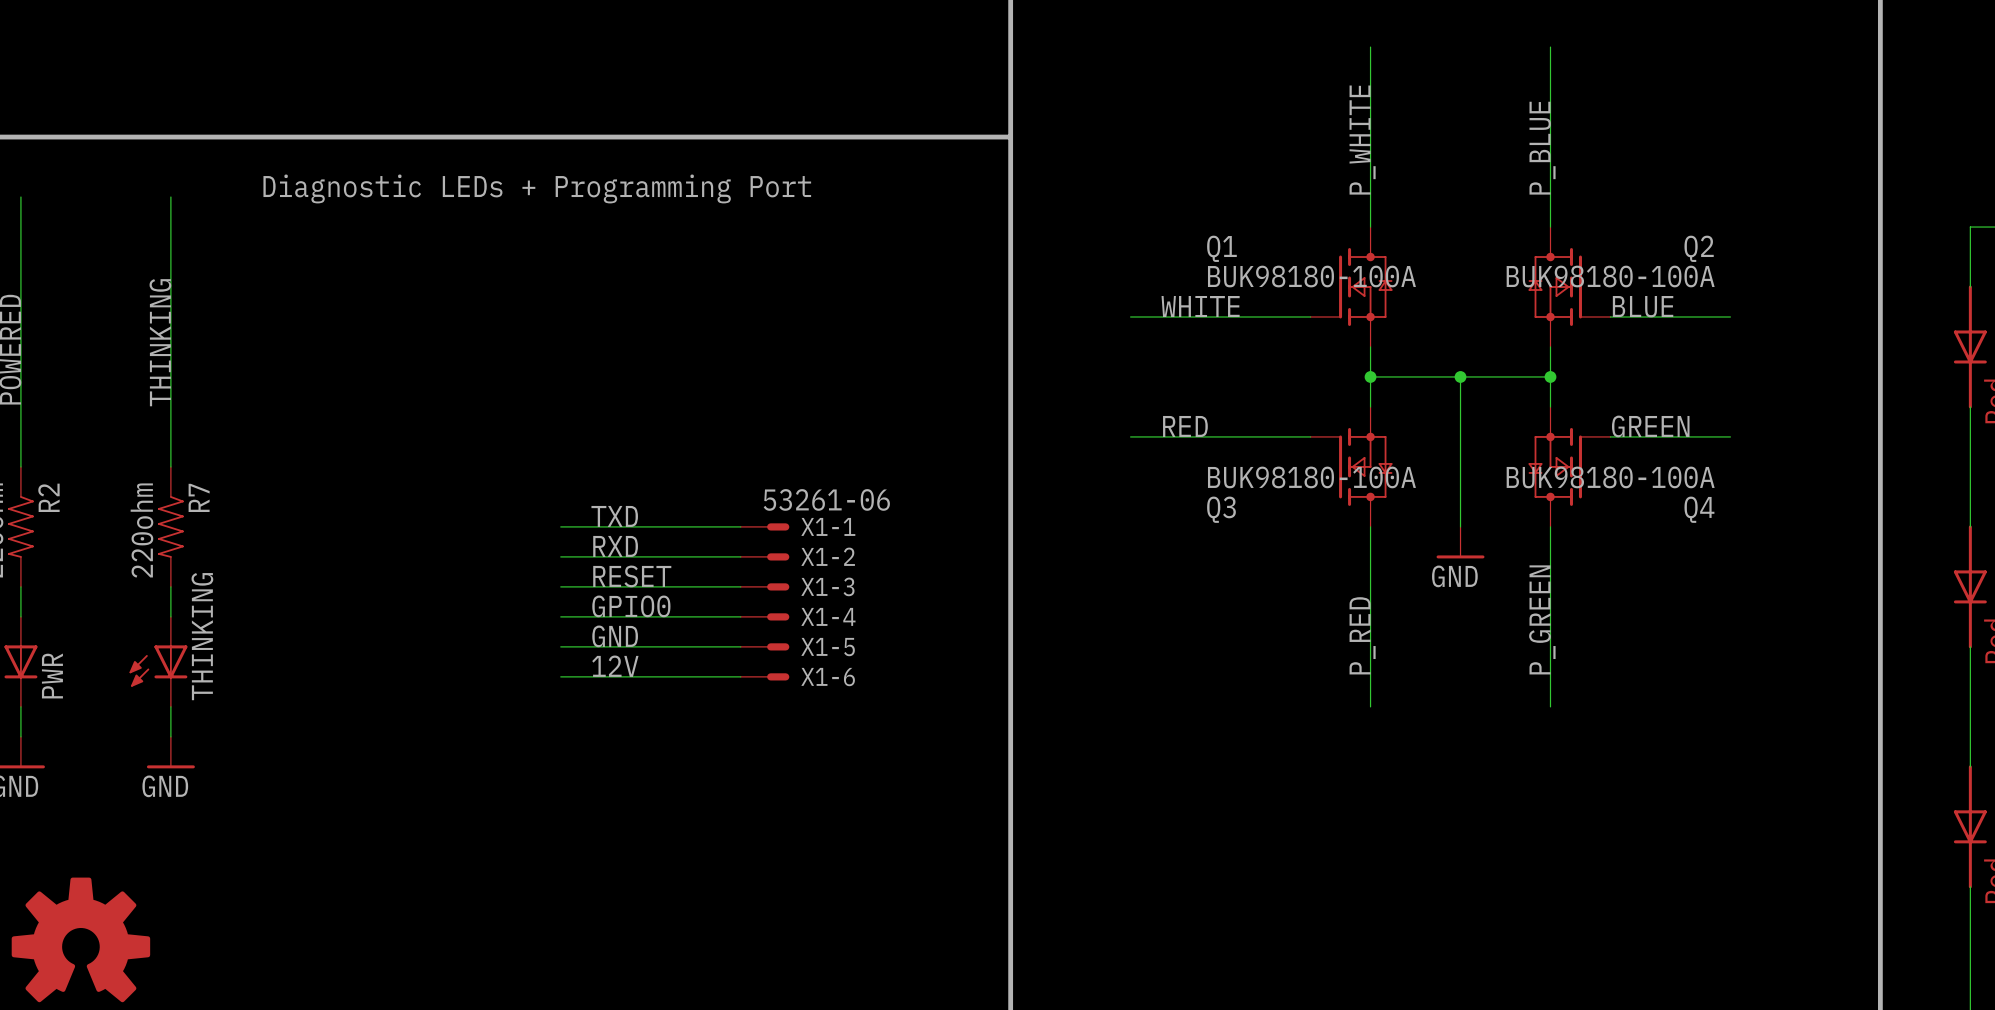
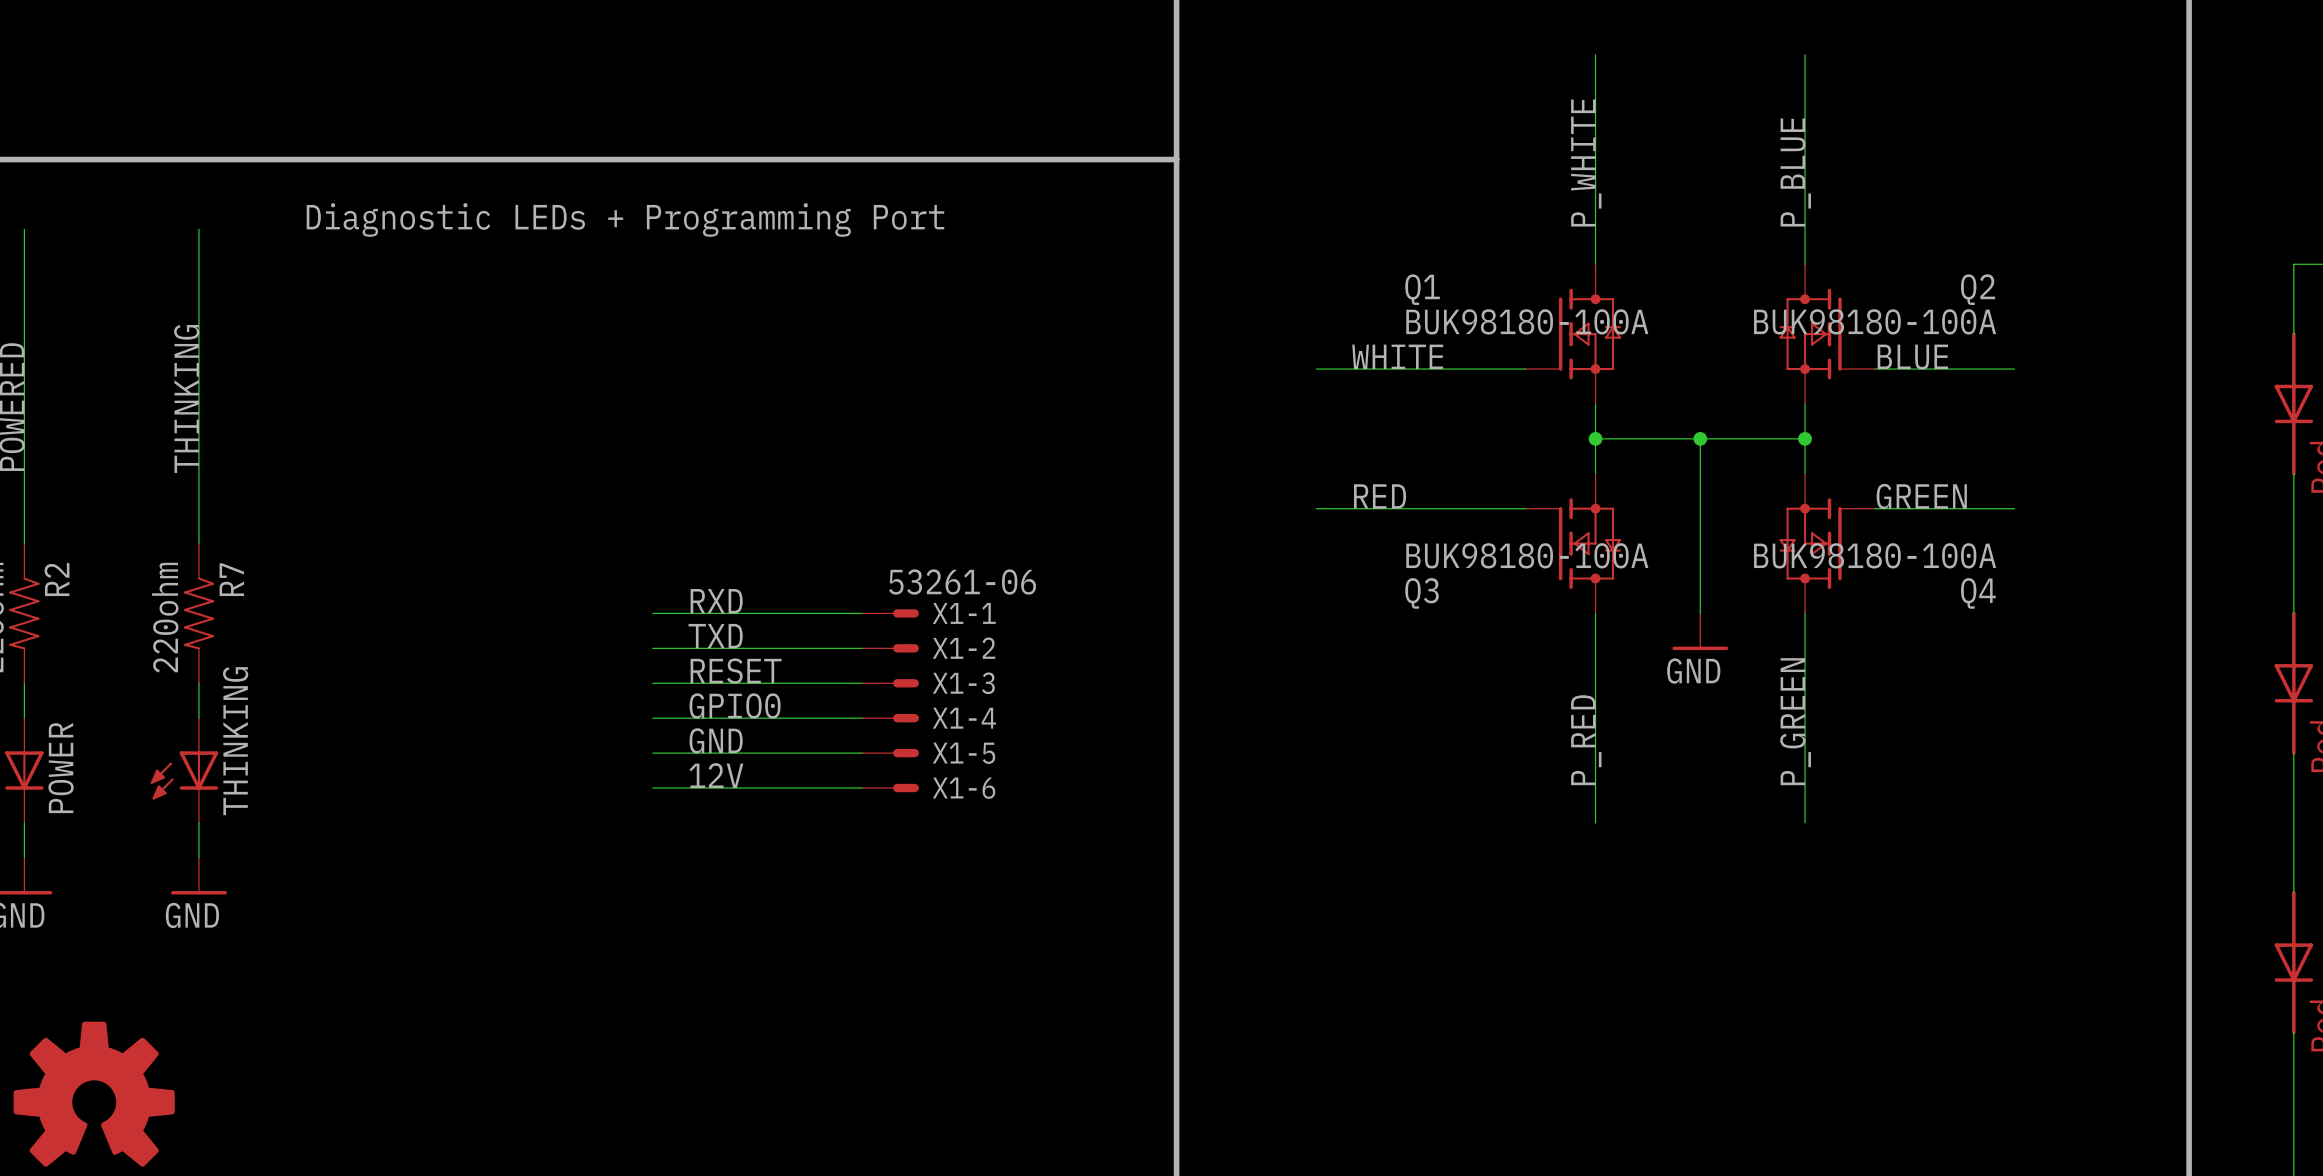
label: TXD (614, 516) -> RXD (716, 601)
label: RXD (615, 546) -> TXD (715, 636)
PWR name: PWR (52, 675) -> POWER (61, 768)

